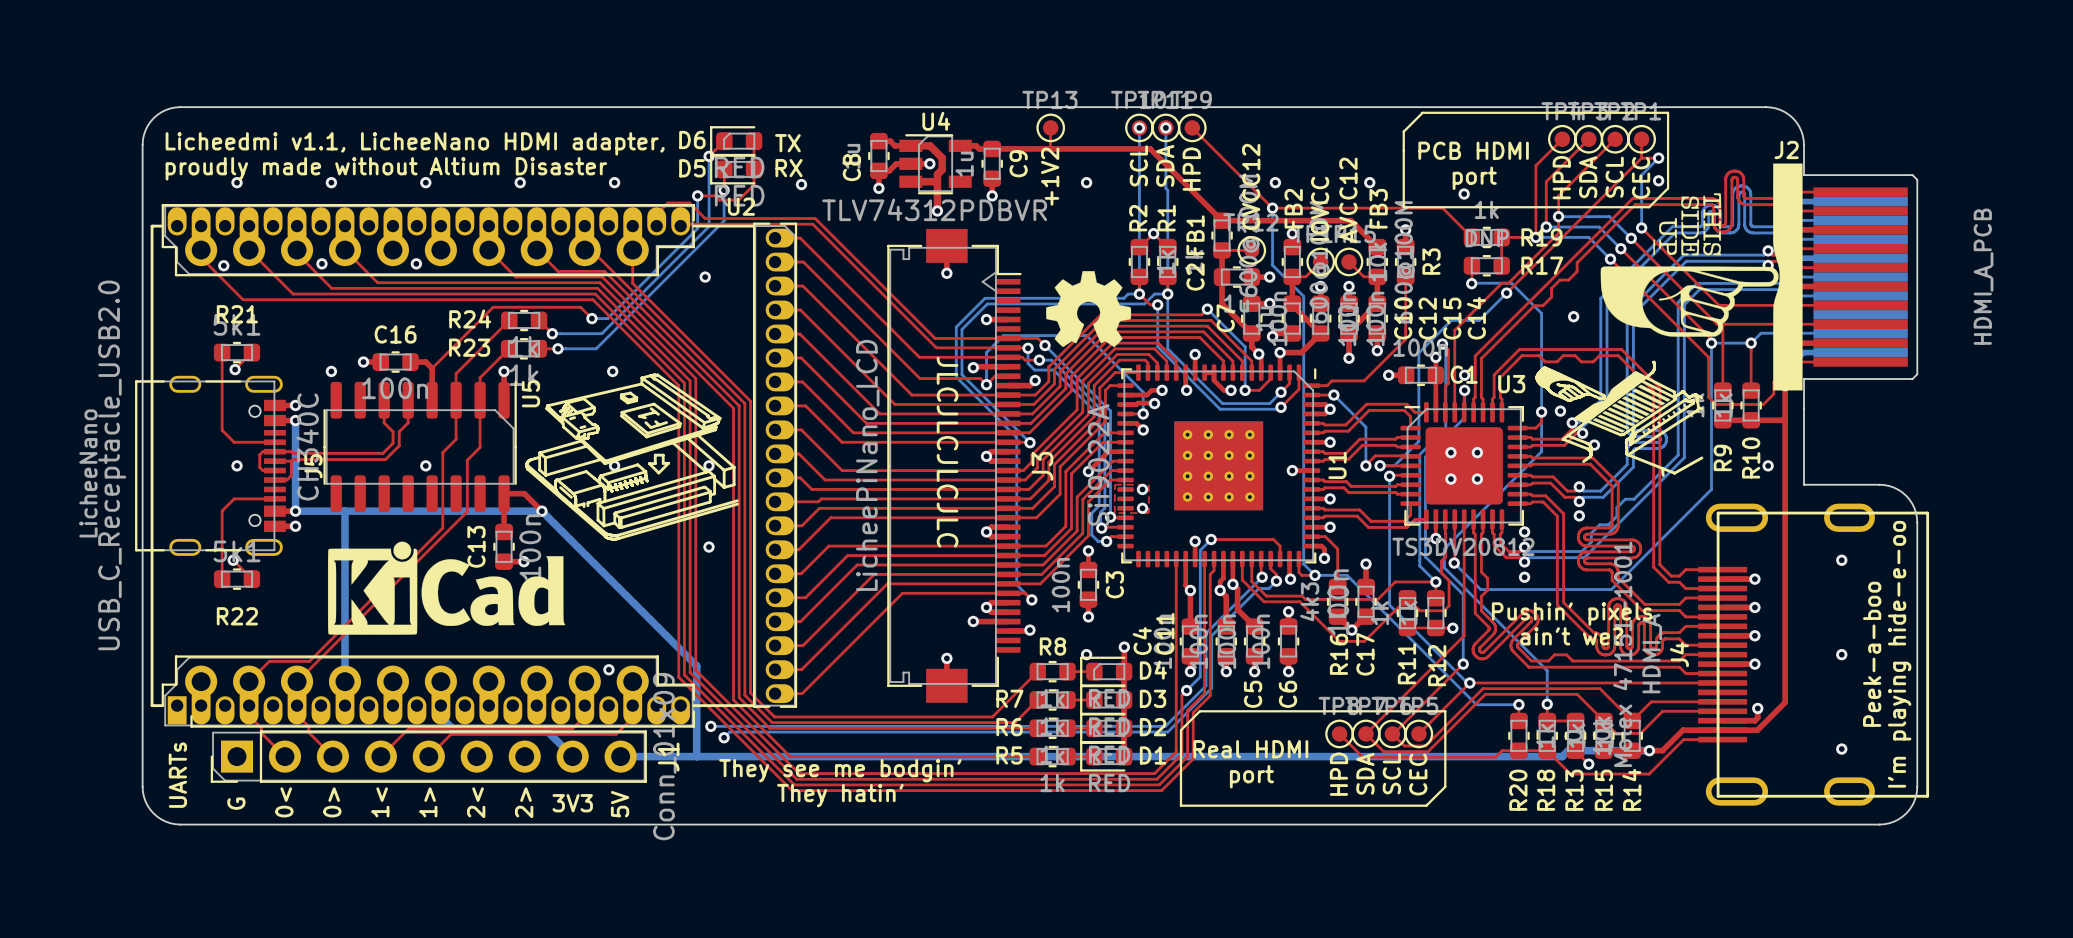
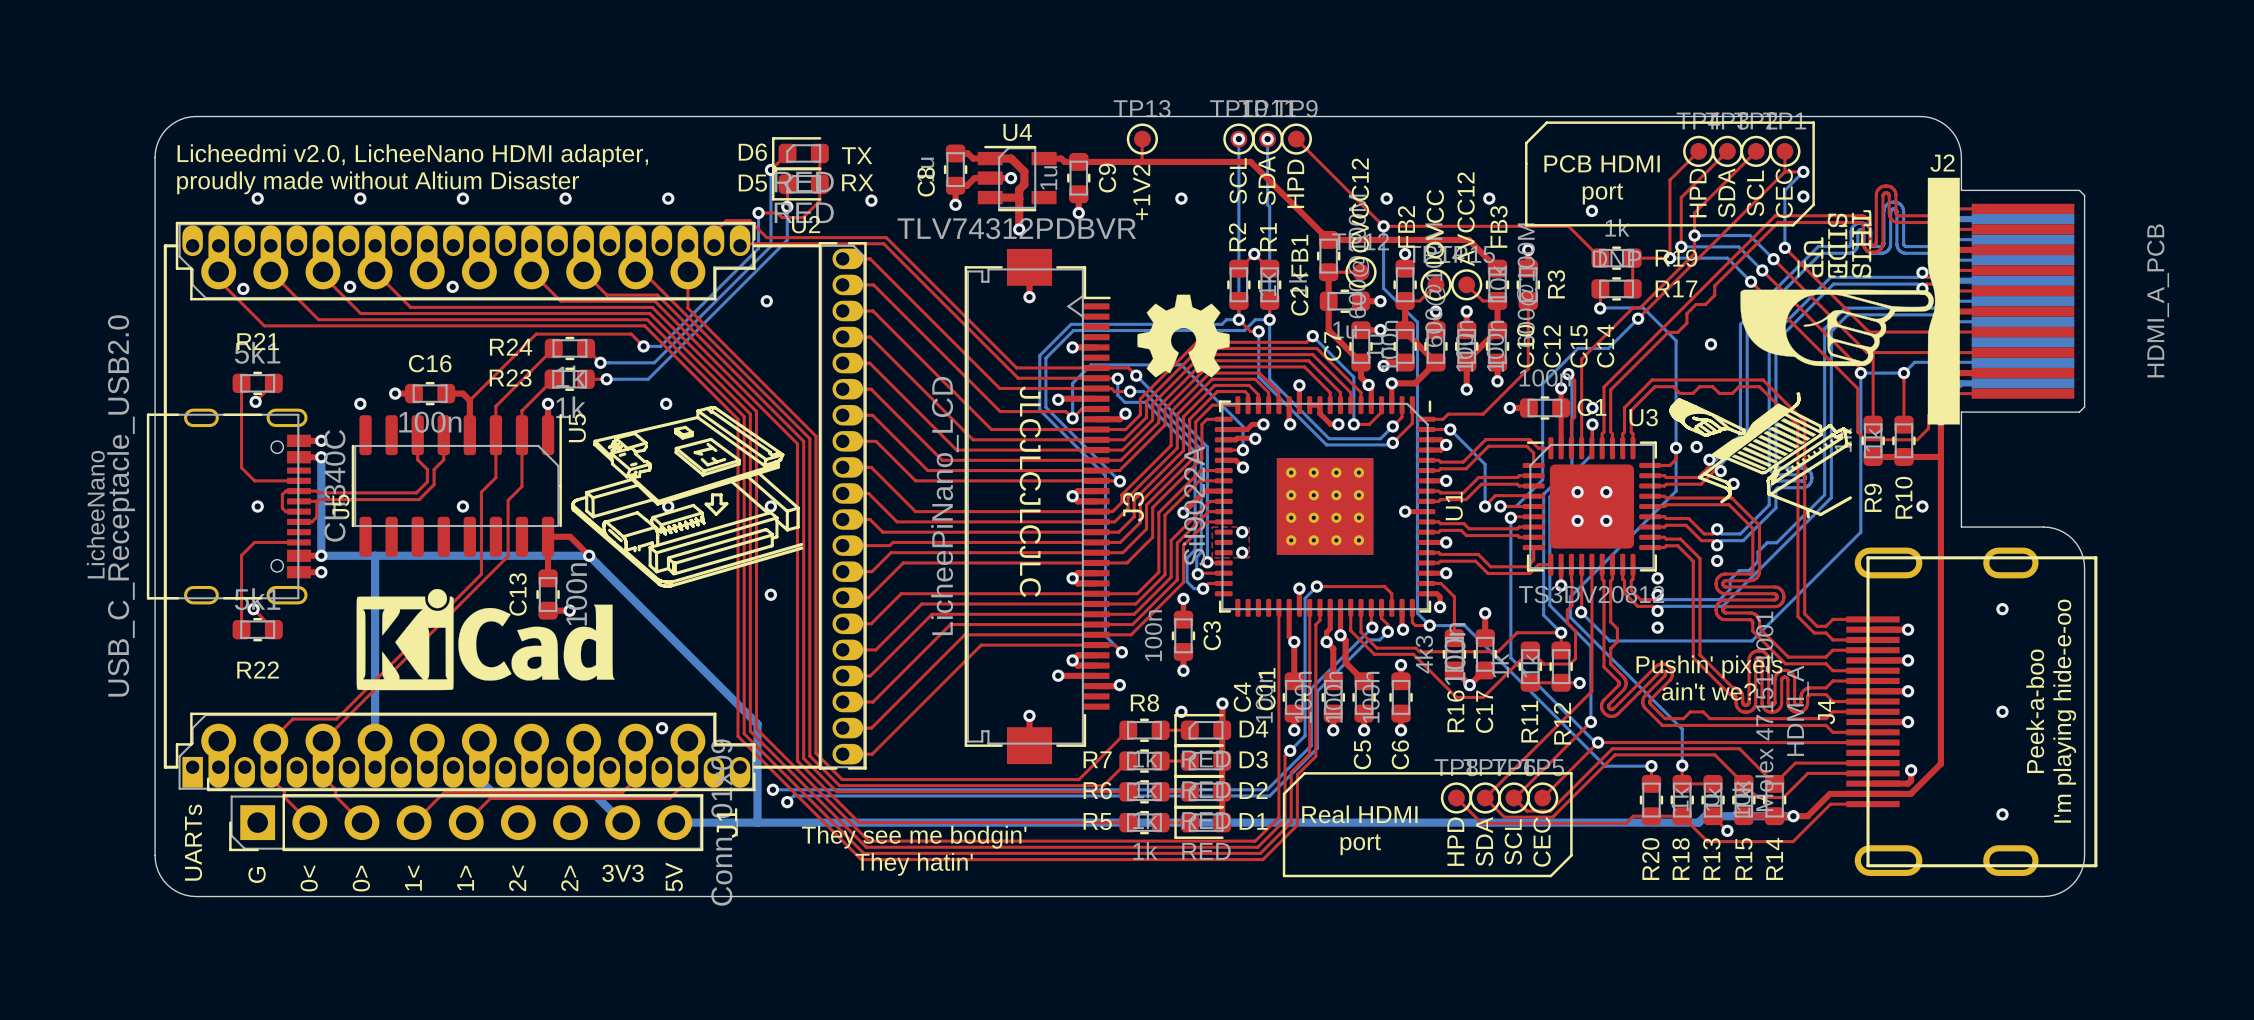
text: Licheedmi v1.1, LicheeNano HDMI adapter, (415, 143) -> Licheedmi v2.0, LicheeNano HDMI adapter, (412, 155)

